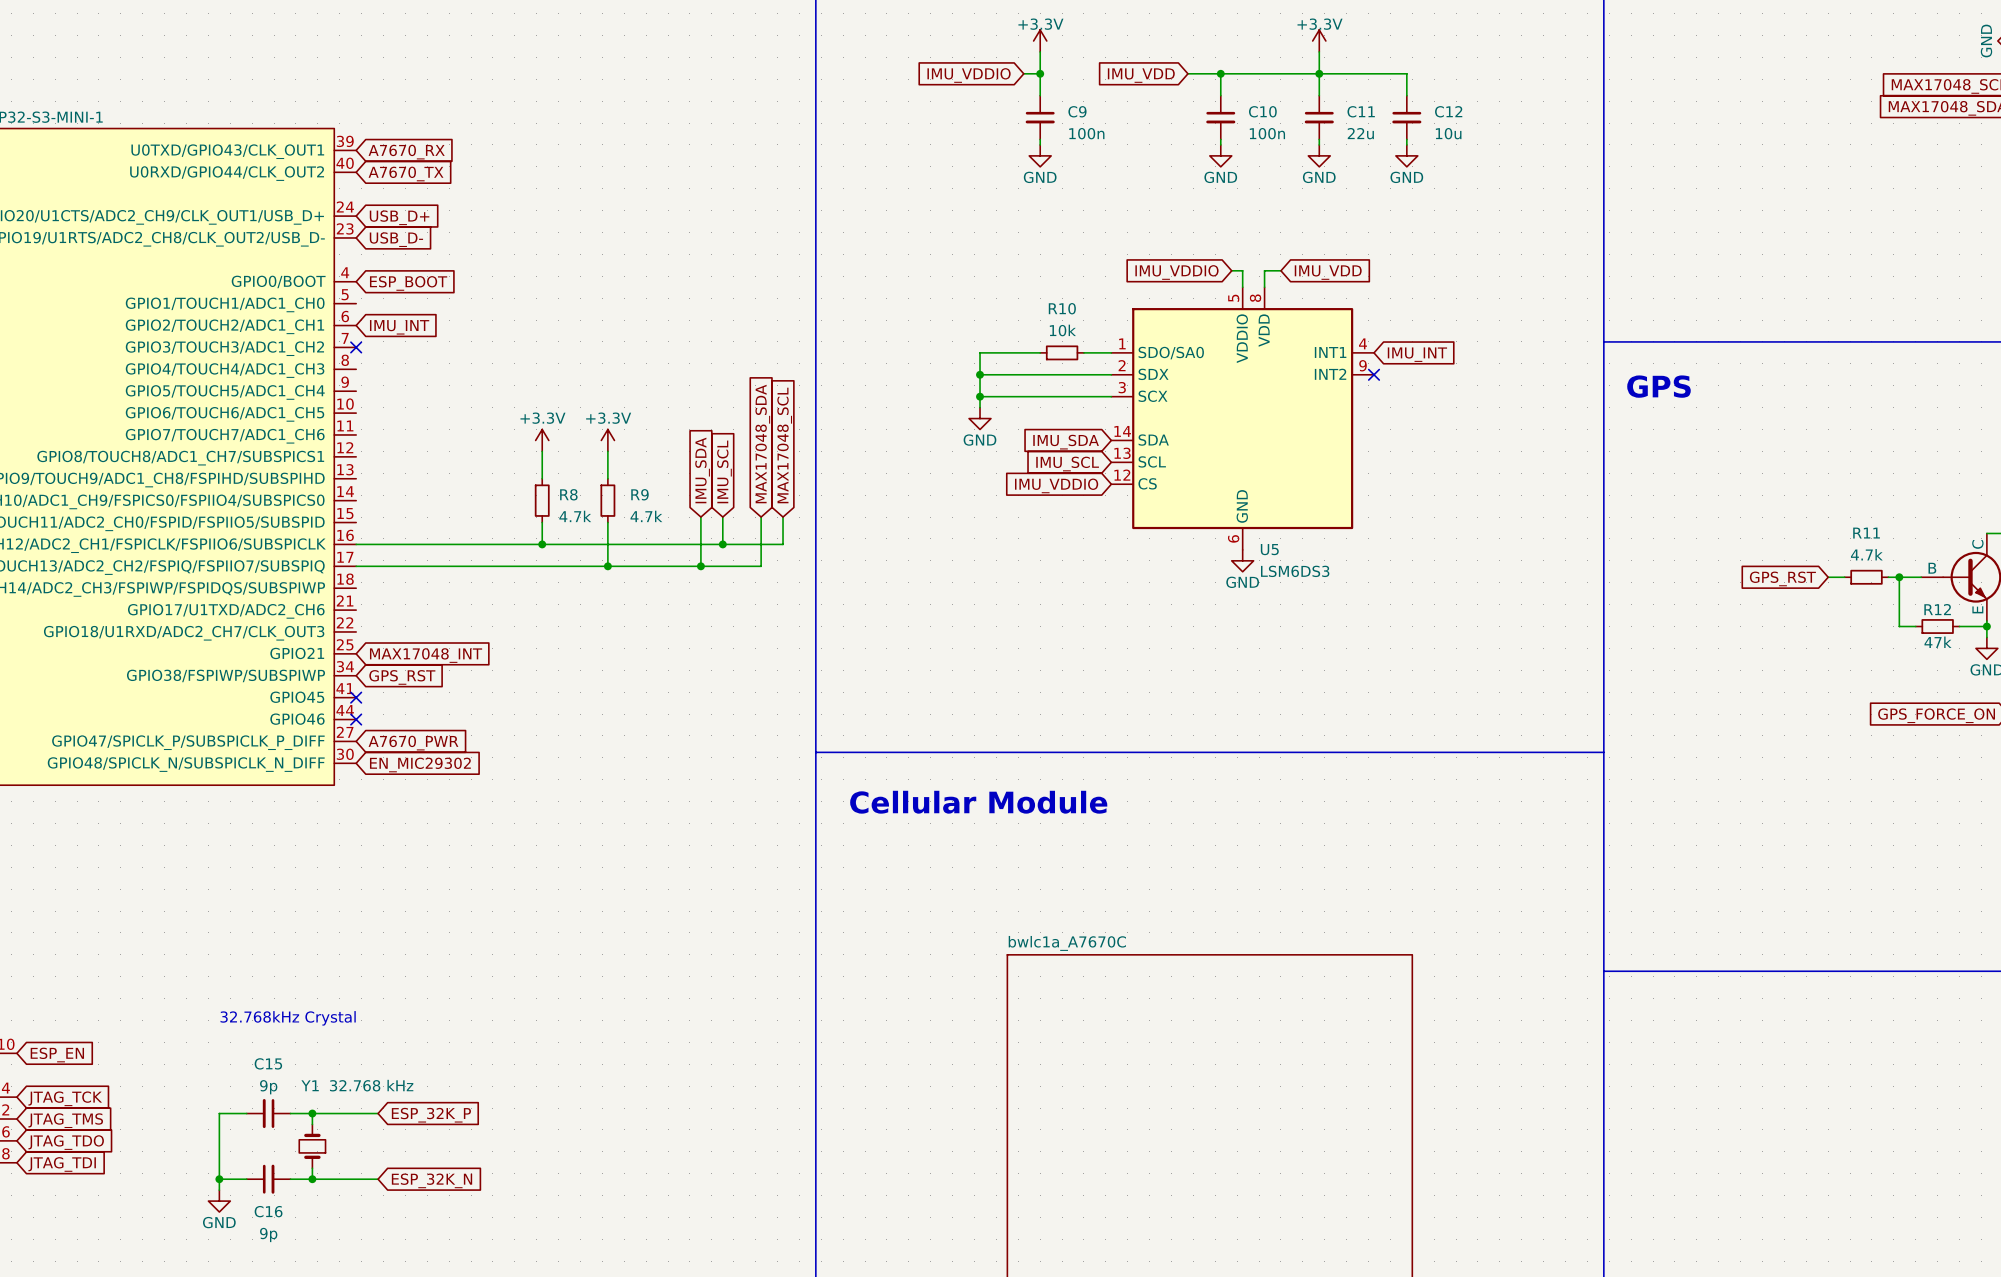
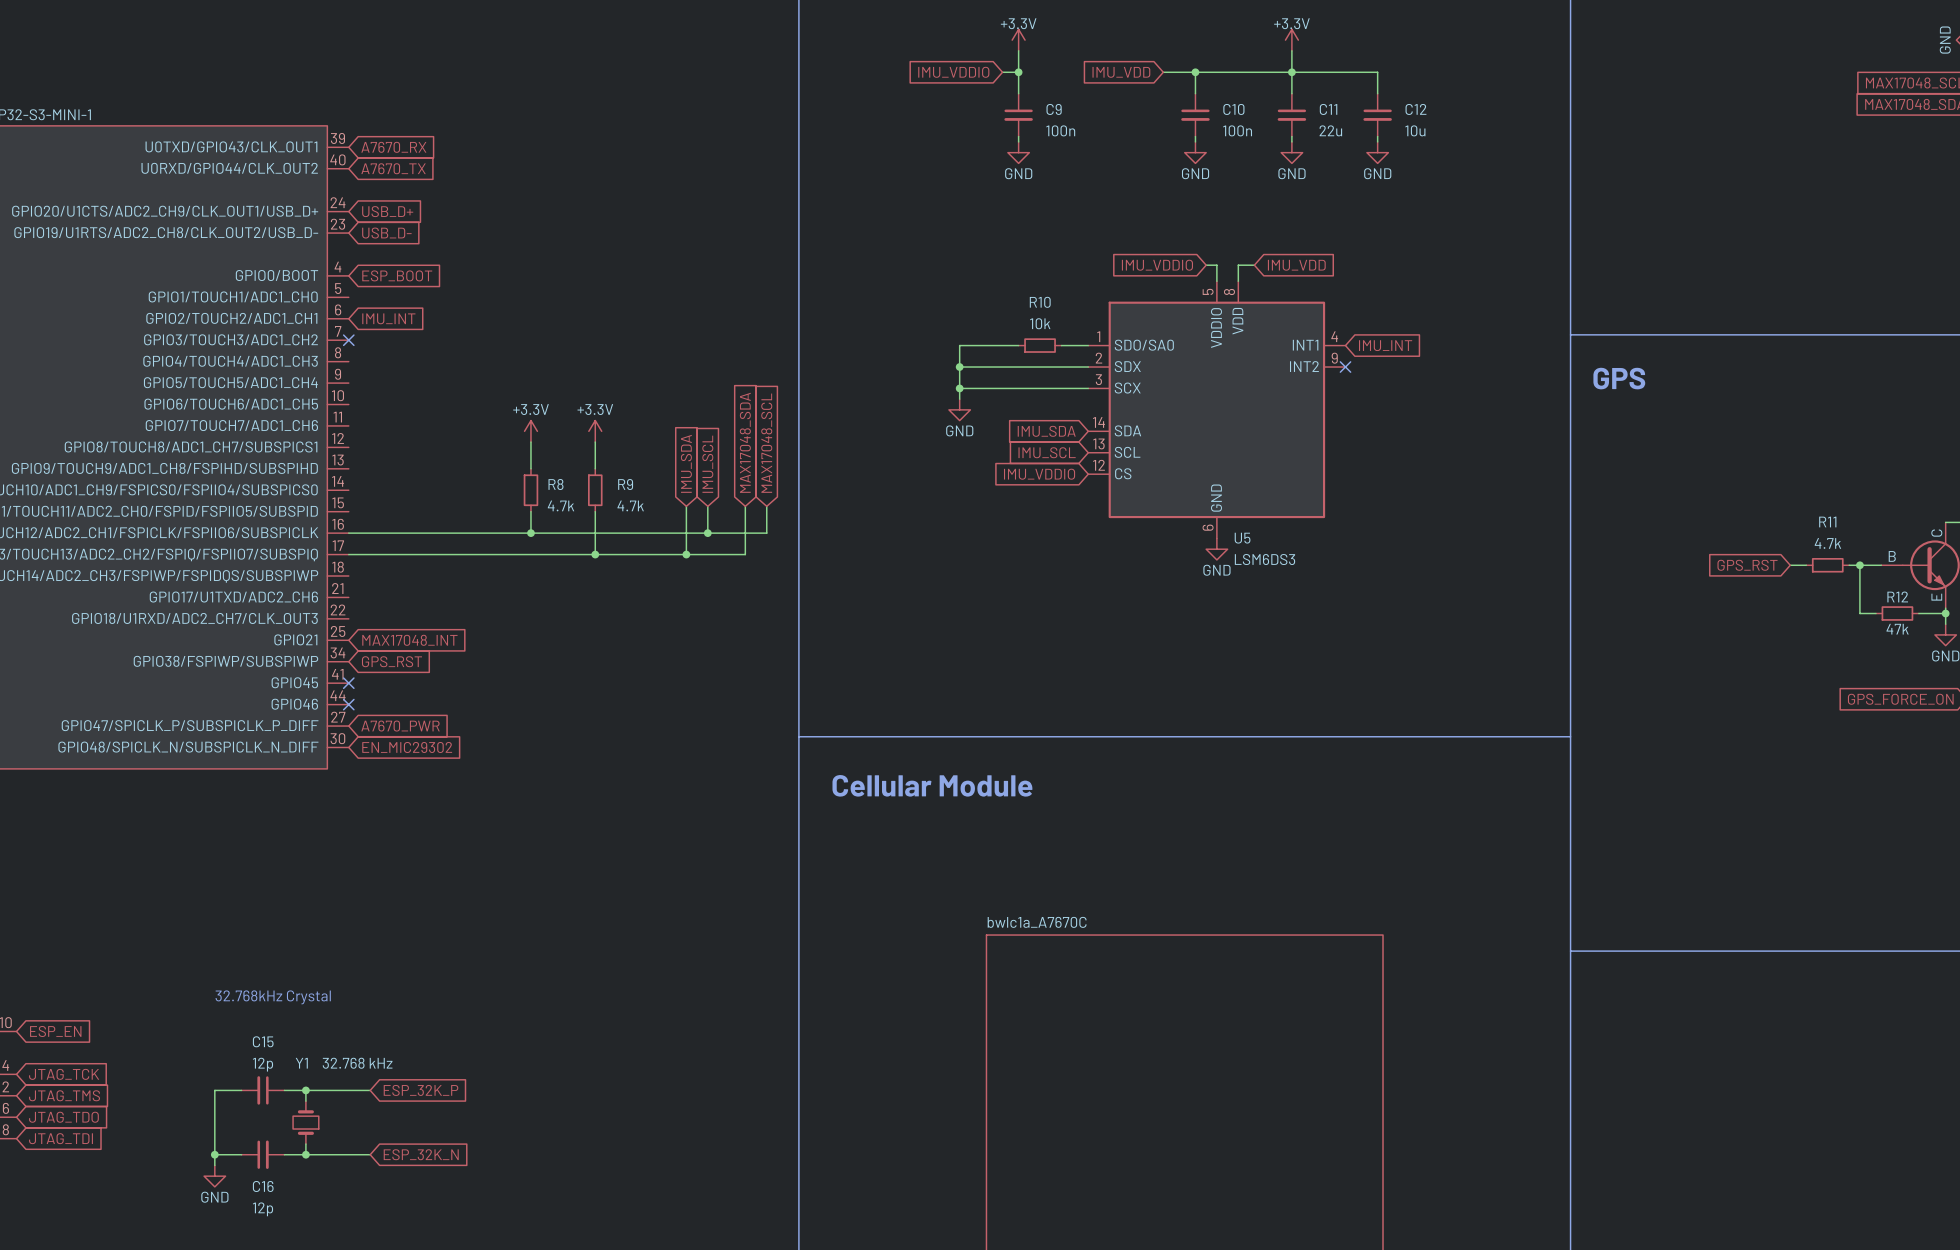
C15 value: 9p (268, 1087) -> 12p (263, 1064)
C16 value: 9p (268, 1234) -> 12p (263, 1209)

